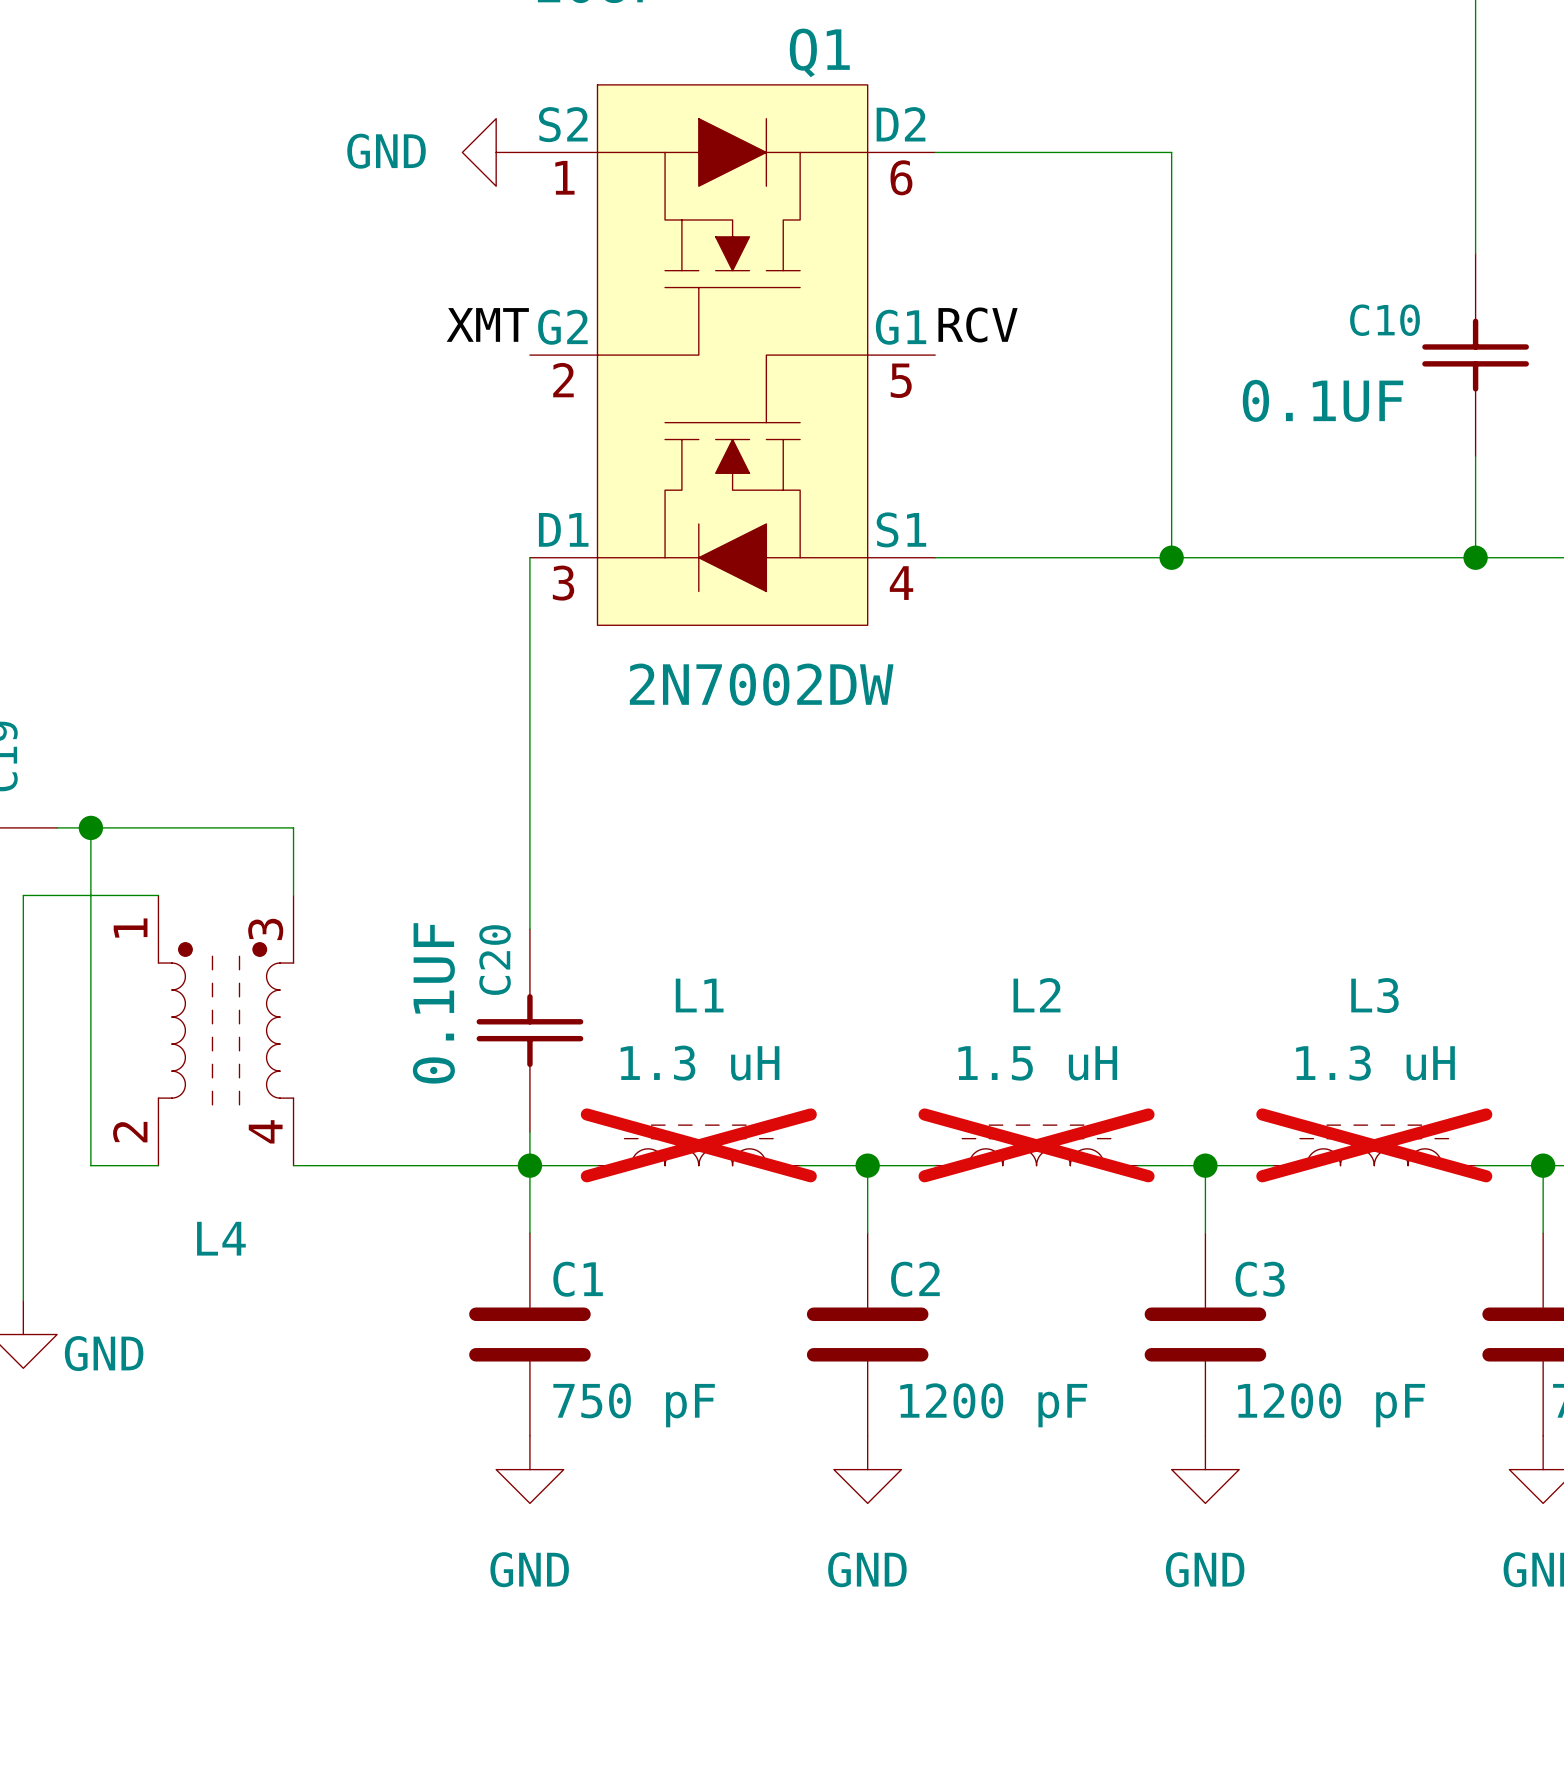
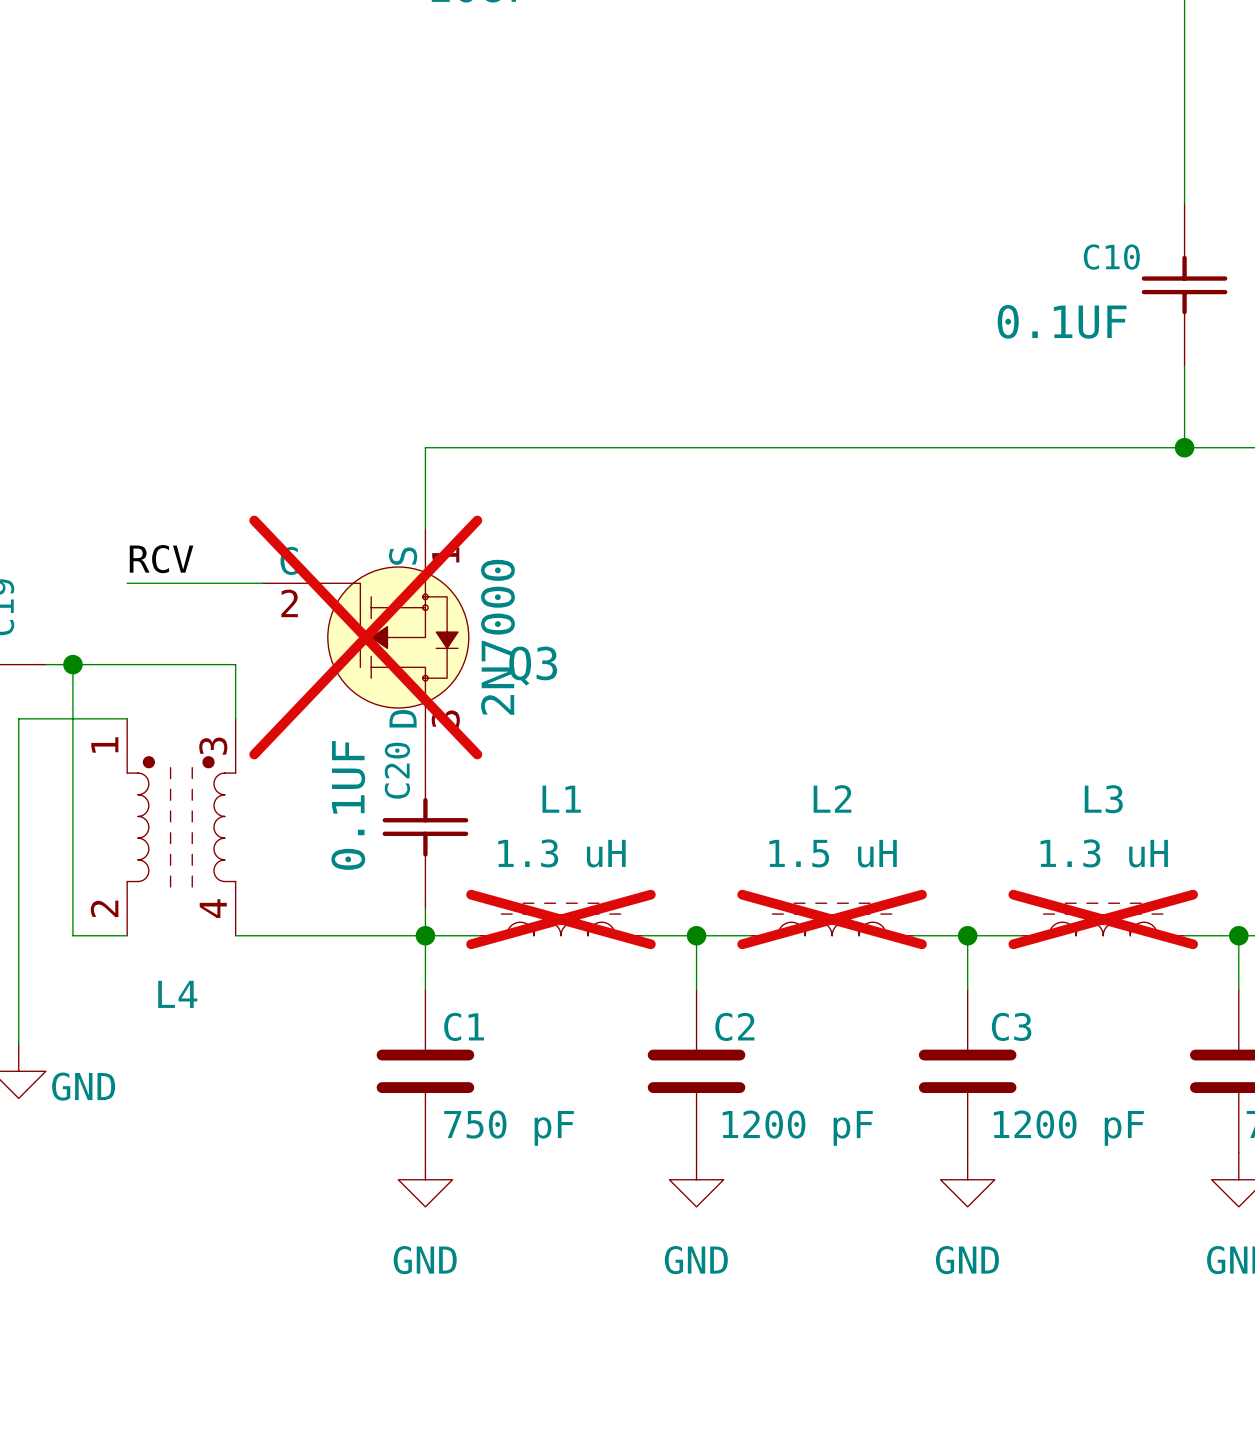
power symbol: GND (496, 152) -> none
wire: (935, 152) (1171, 152) (1171, 557) -> none
label: XMT (487, 324) -> none
label: RCV (978, 324) -> none
Q1: 2N7002DW (732, 355) -> none
junction: (1171, 557) -> none
label: none -> RCV (161, 559)
wire: none -> (127, 583) (262, 583)
Q3: none -> 2N7000 (365, 637)

